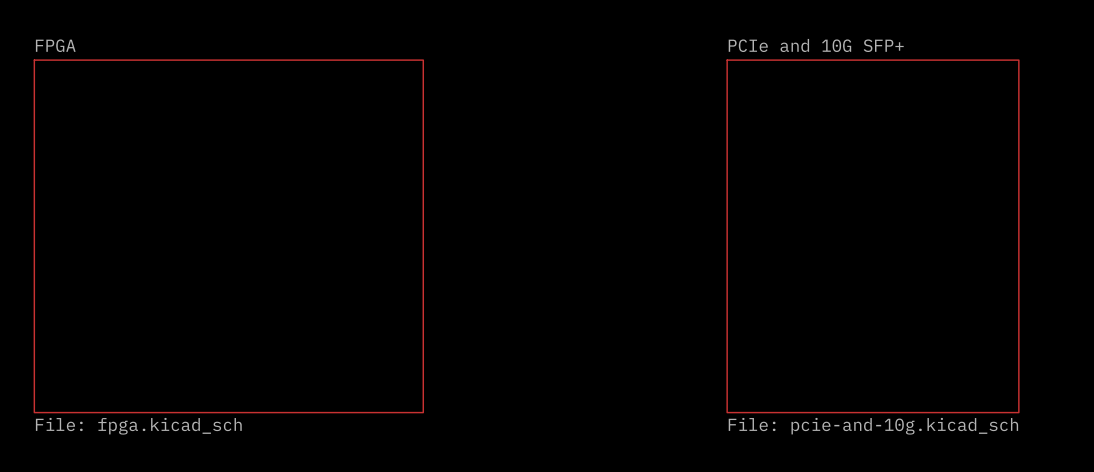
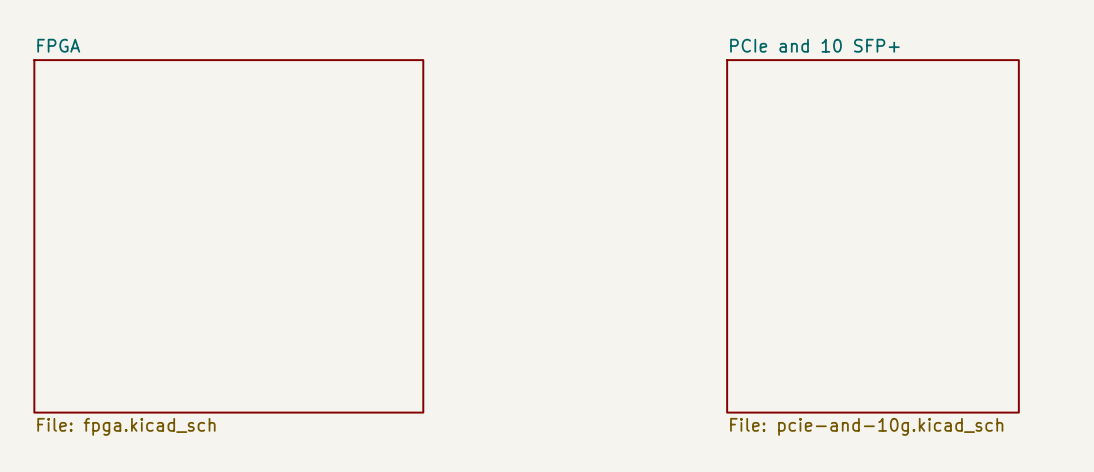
sheet PCIe and 10G SFP+ name: PCIe and 10G SFP+ (816, 45) -> PCIe and 10 SFP+ (814, 45)

